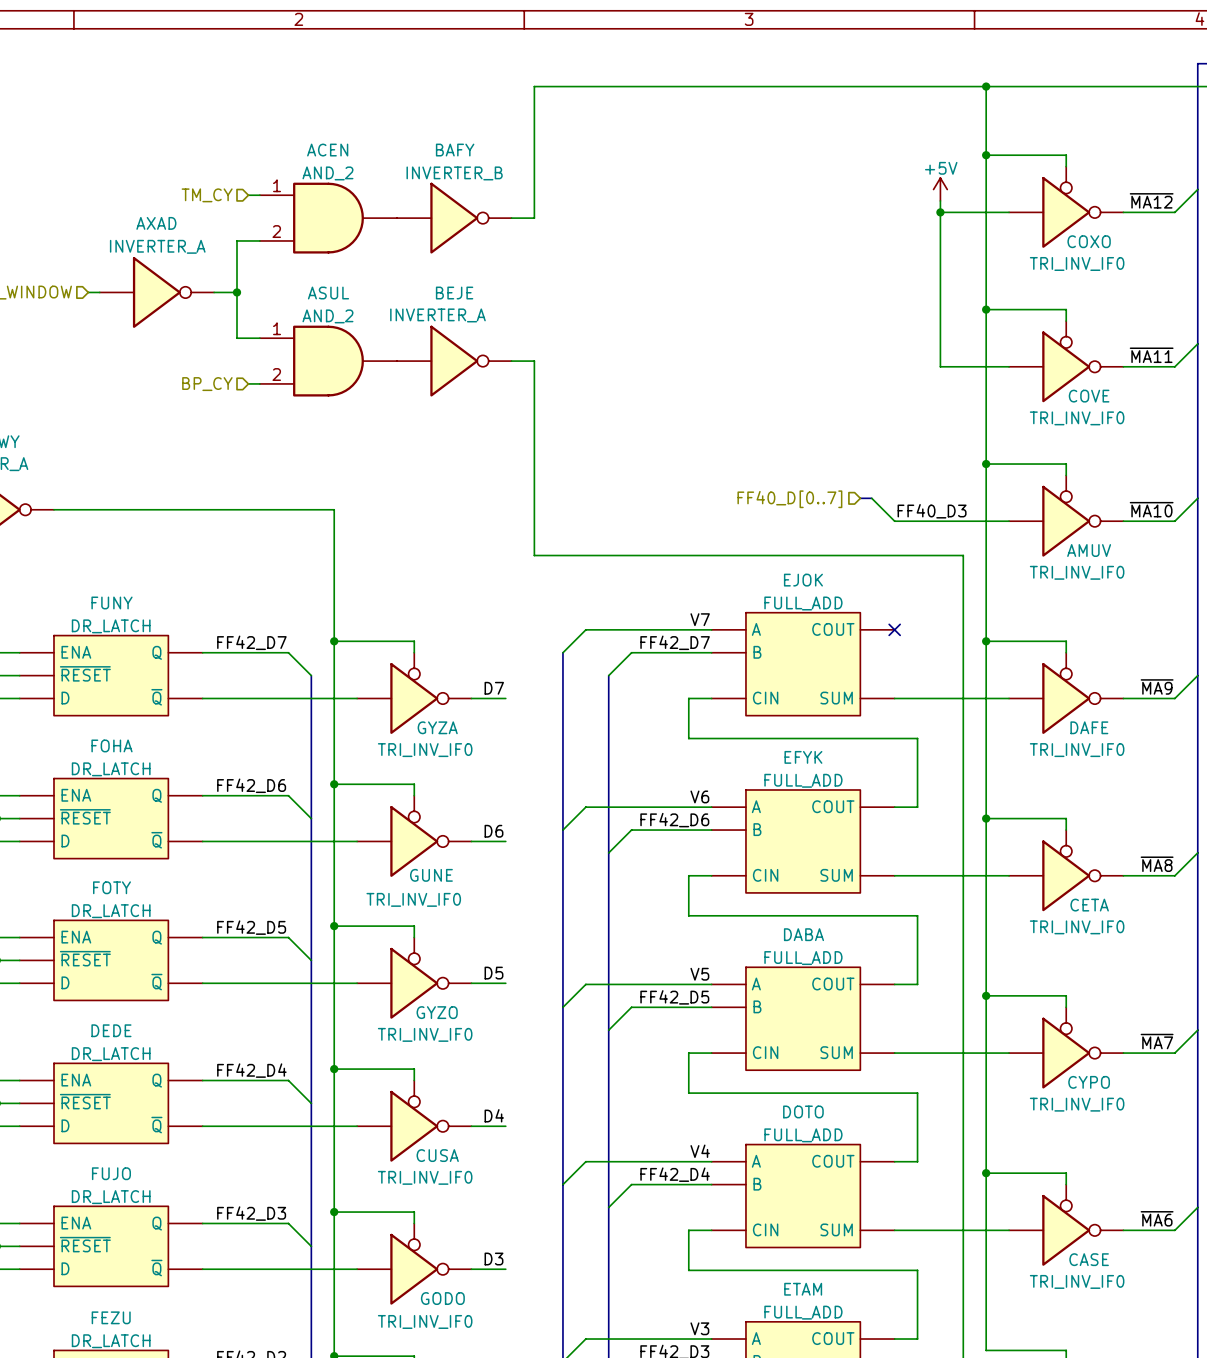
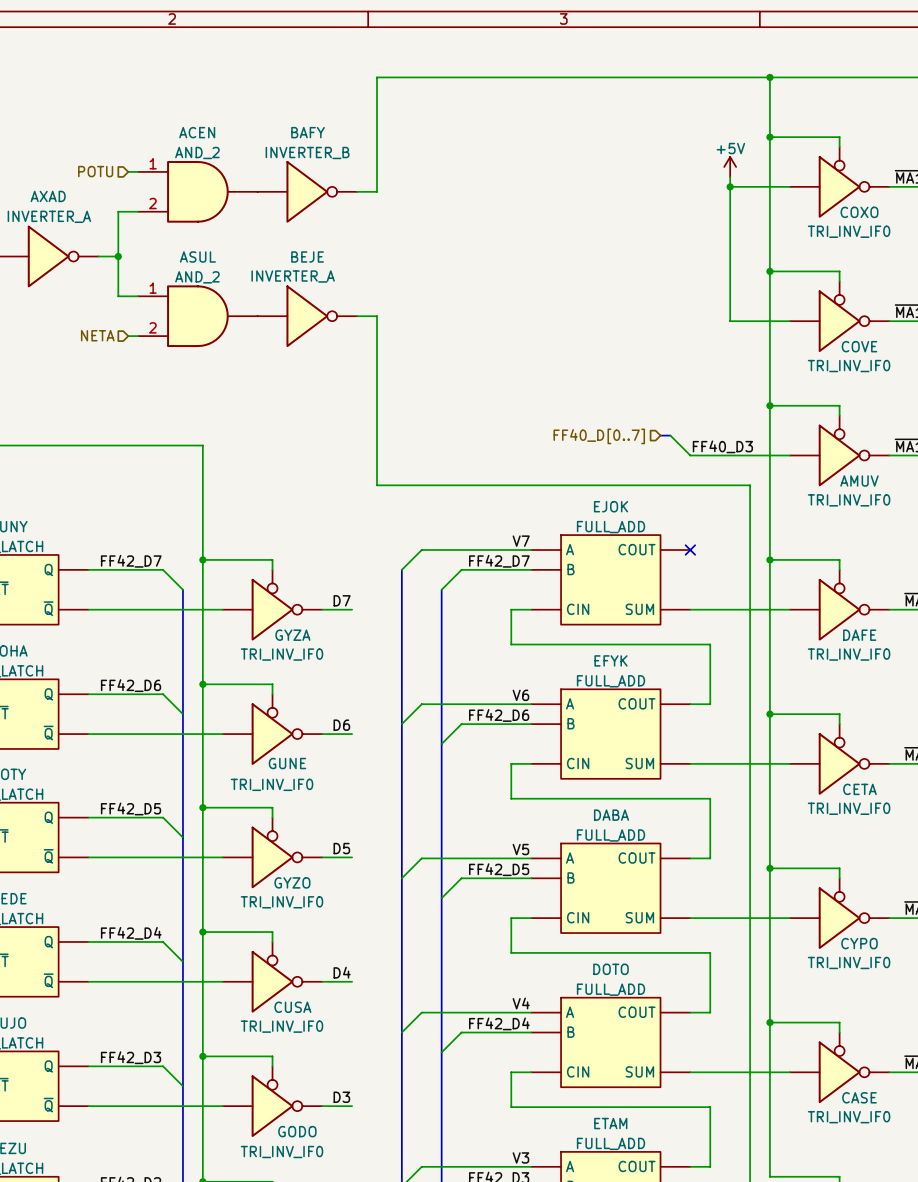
hierarchical label: TM_CY (207, 195) -> POTU (95, 171)
hierarchical label: BP_CY (207, 384) -> NETA (97, 335)

